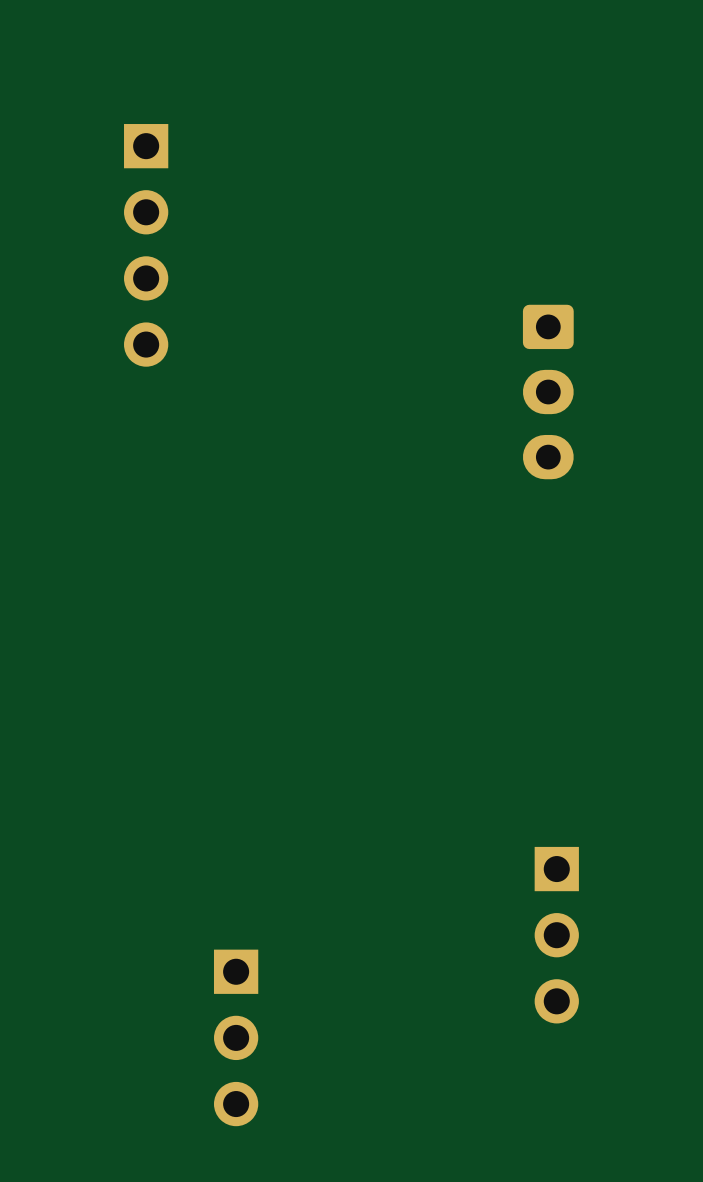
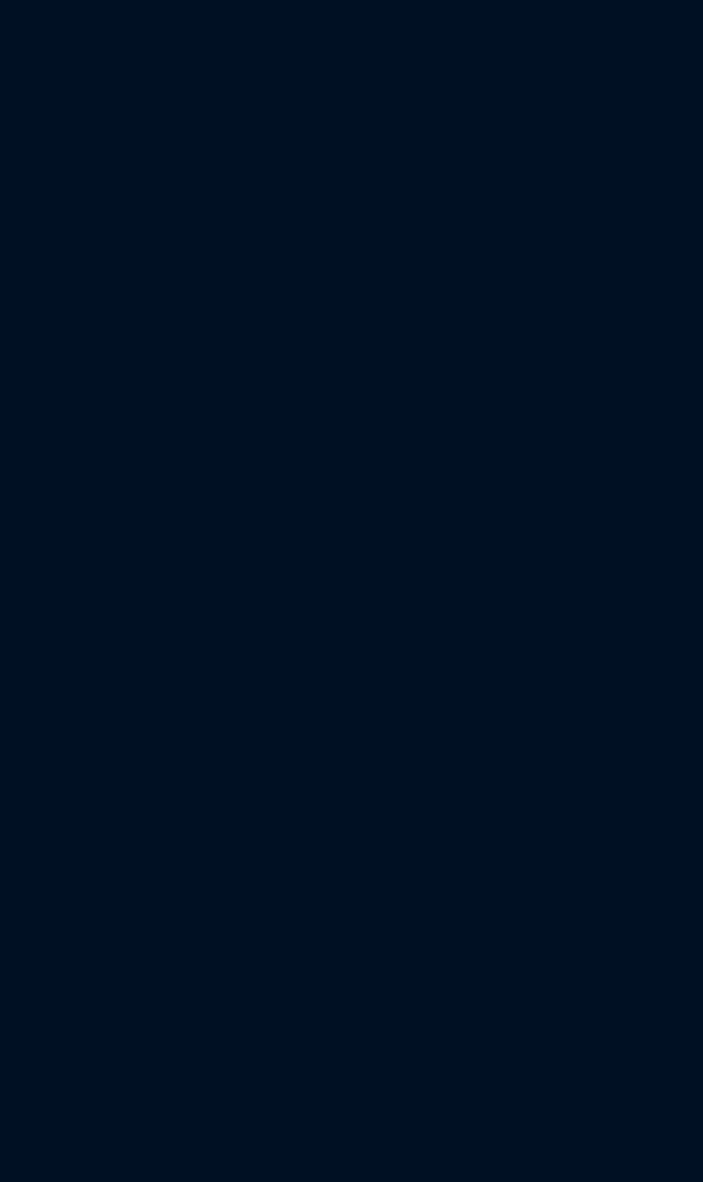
part: (146, 245) -> none
part: (548, 392) -> none
part: (556, 935) -> none
part: (236, 1037) -> none

